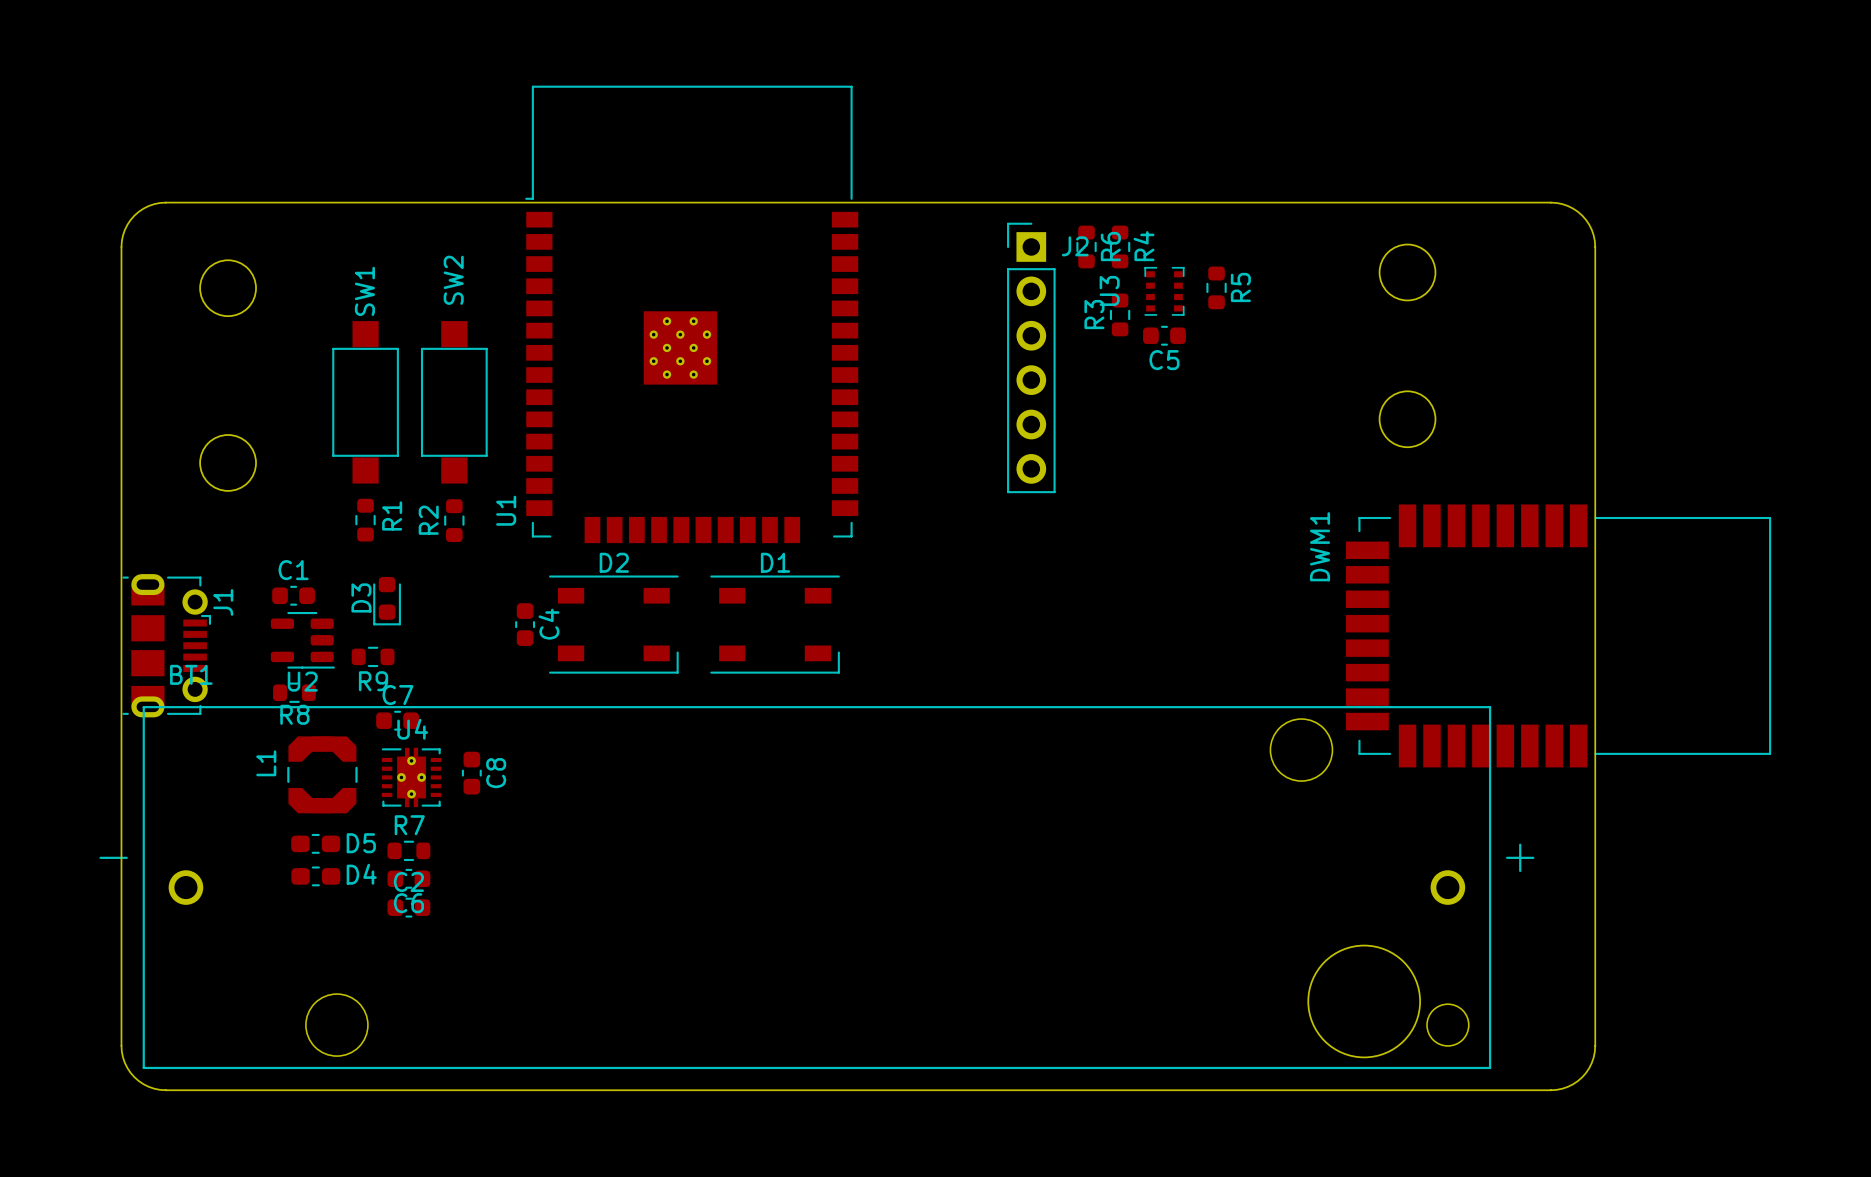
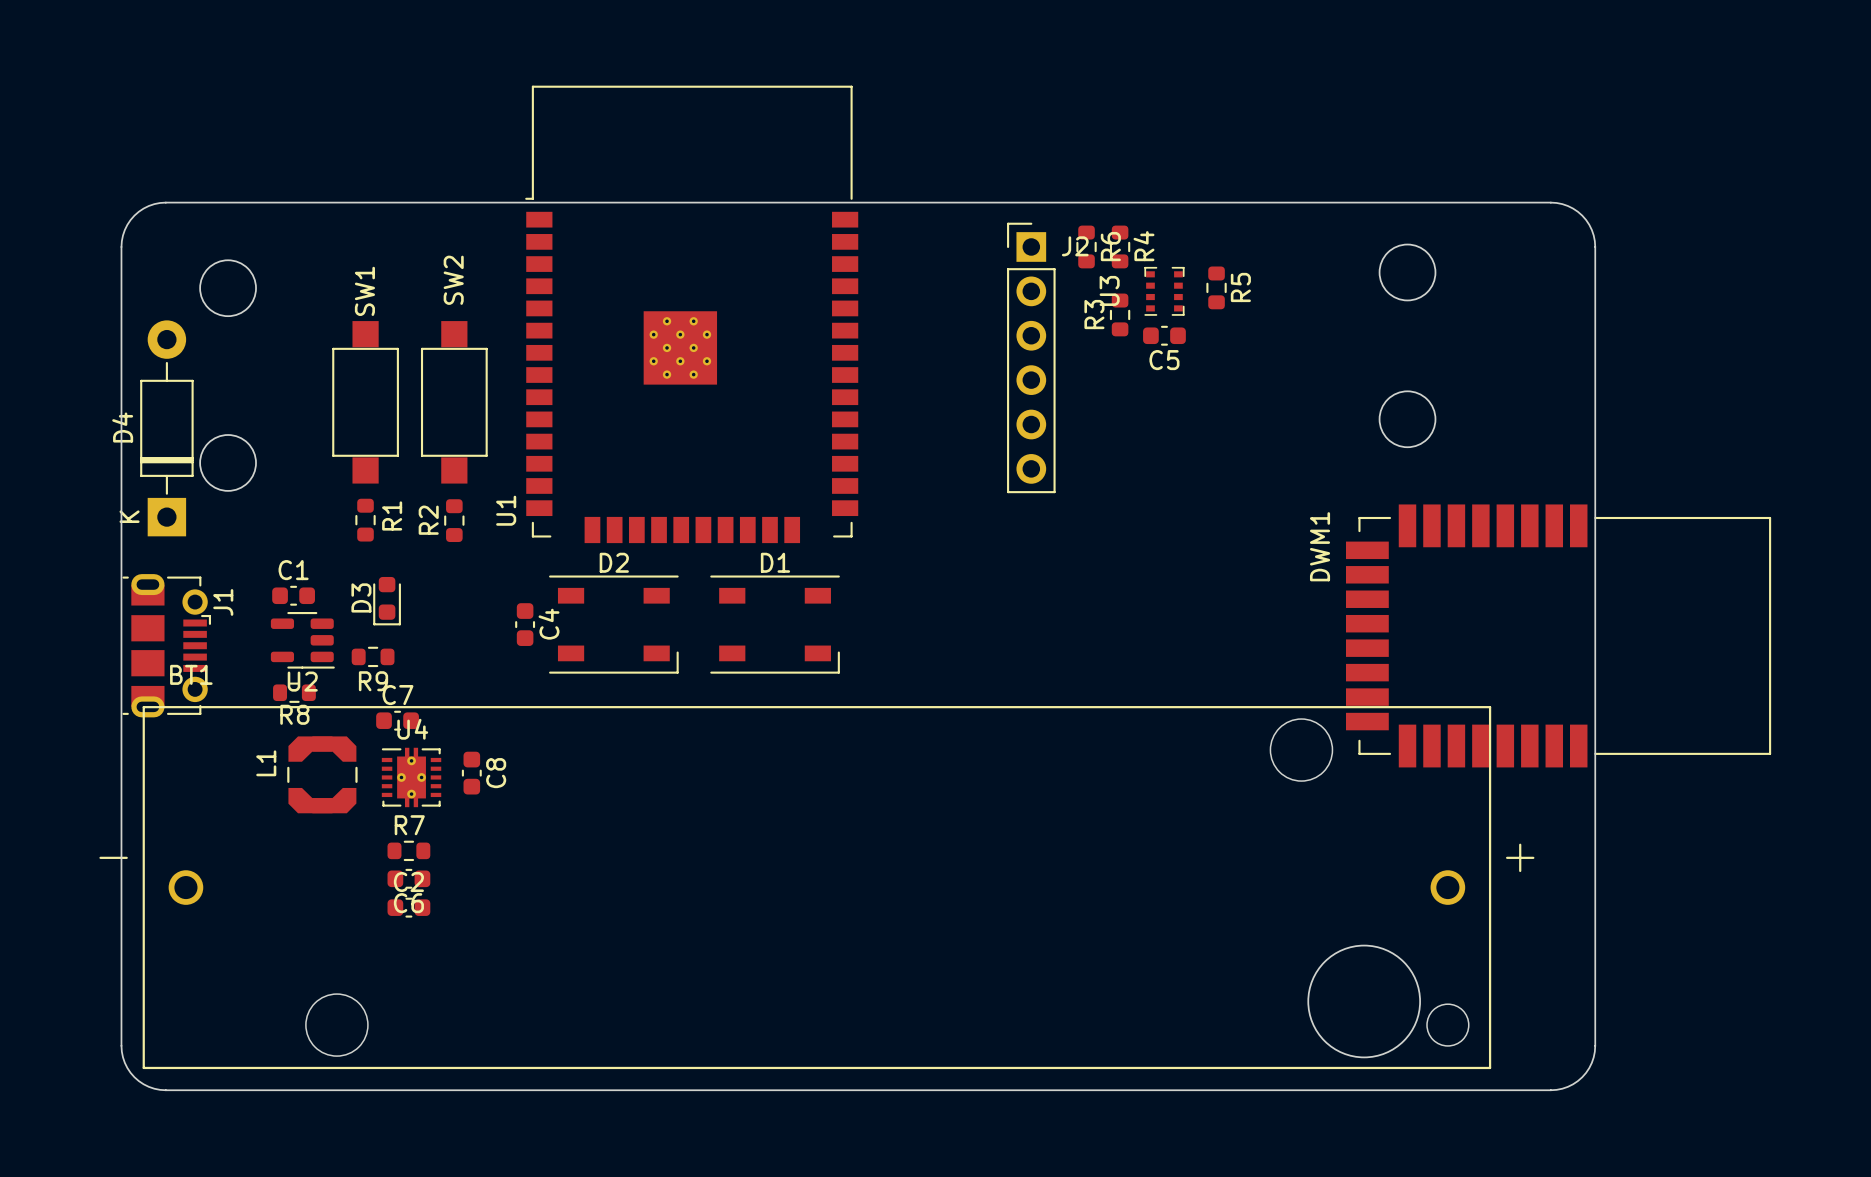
D5: (315, 843) -> none
D4 footprint: [291, 866, 341, 887] -> [140, 320, 194, 537]
D4 name position: D4 (361, 874) -> D4 (122, 427)

